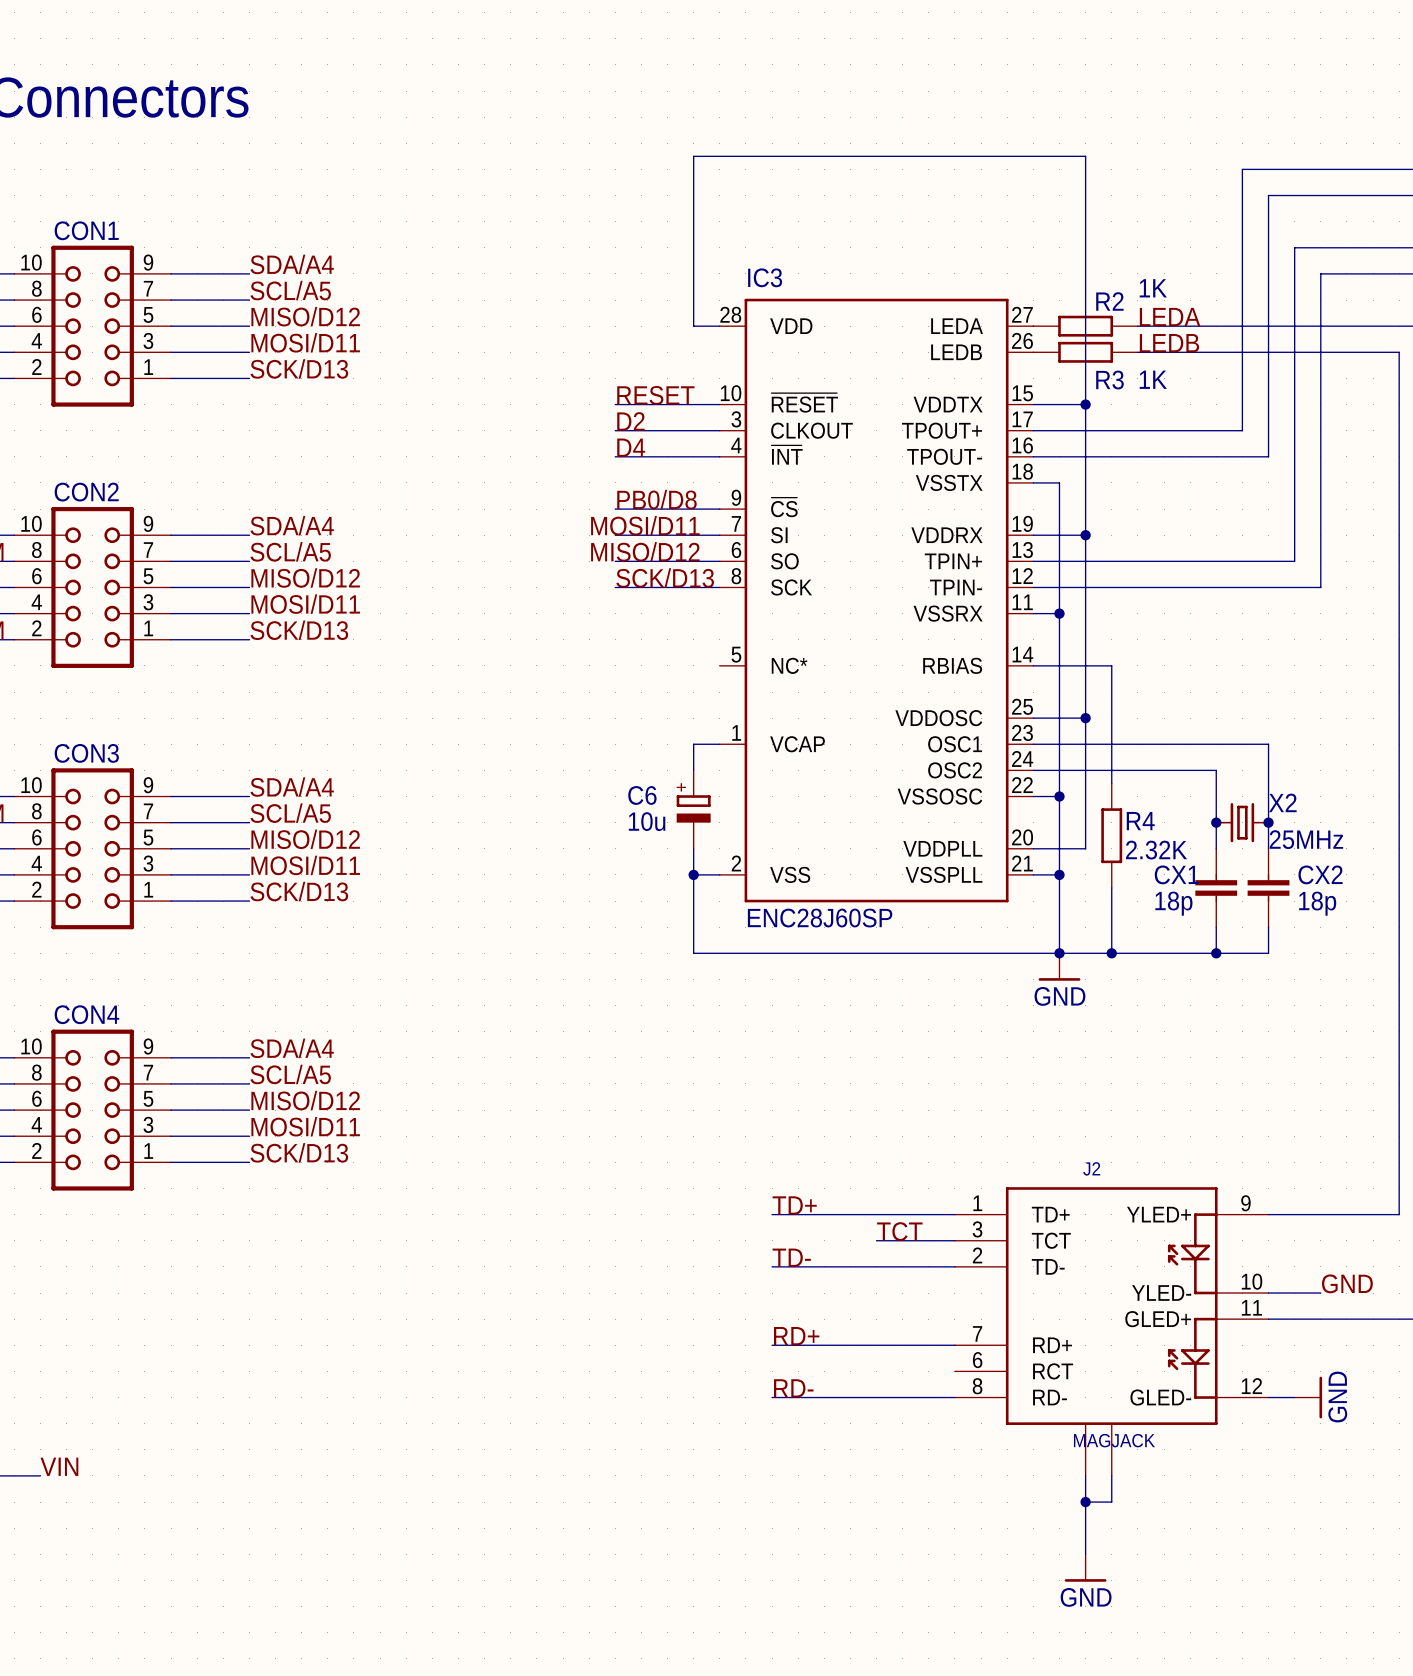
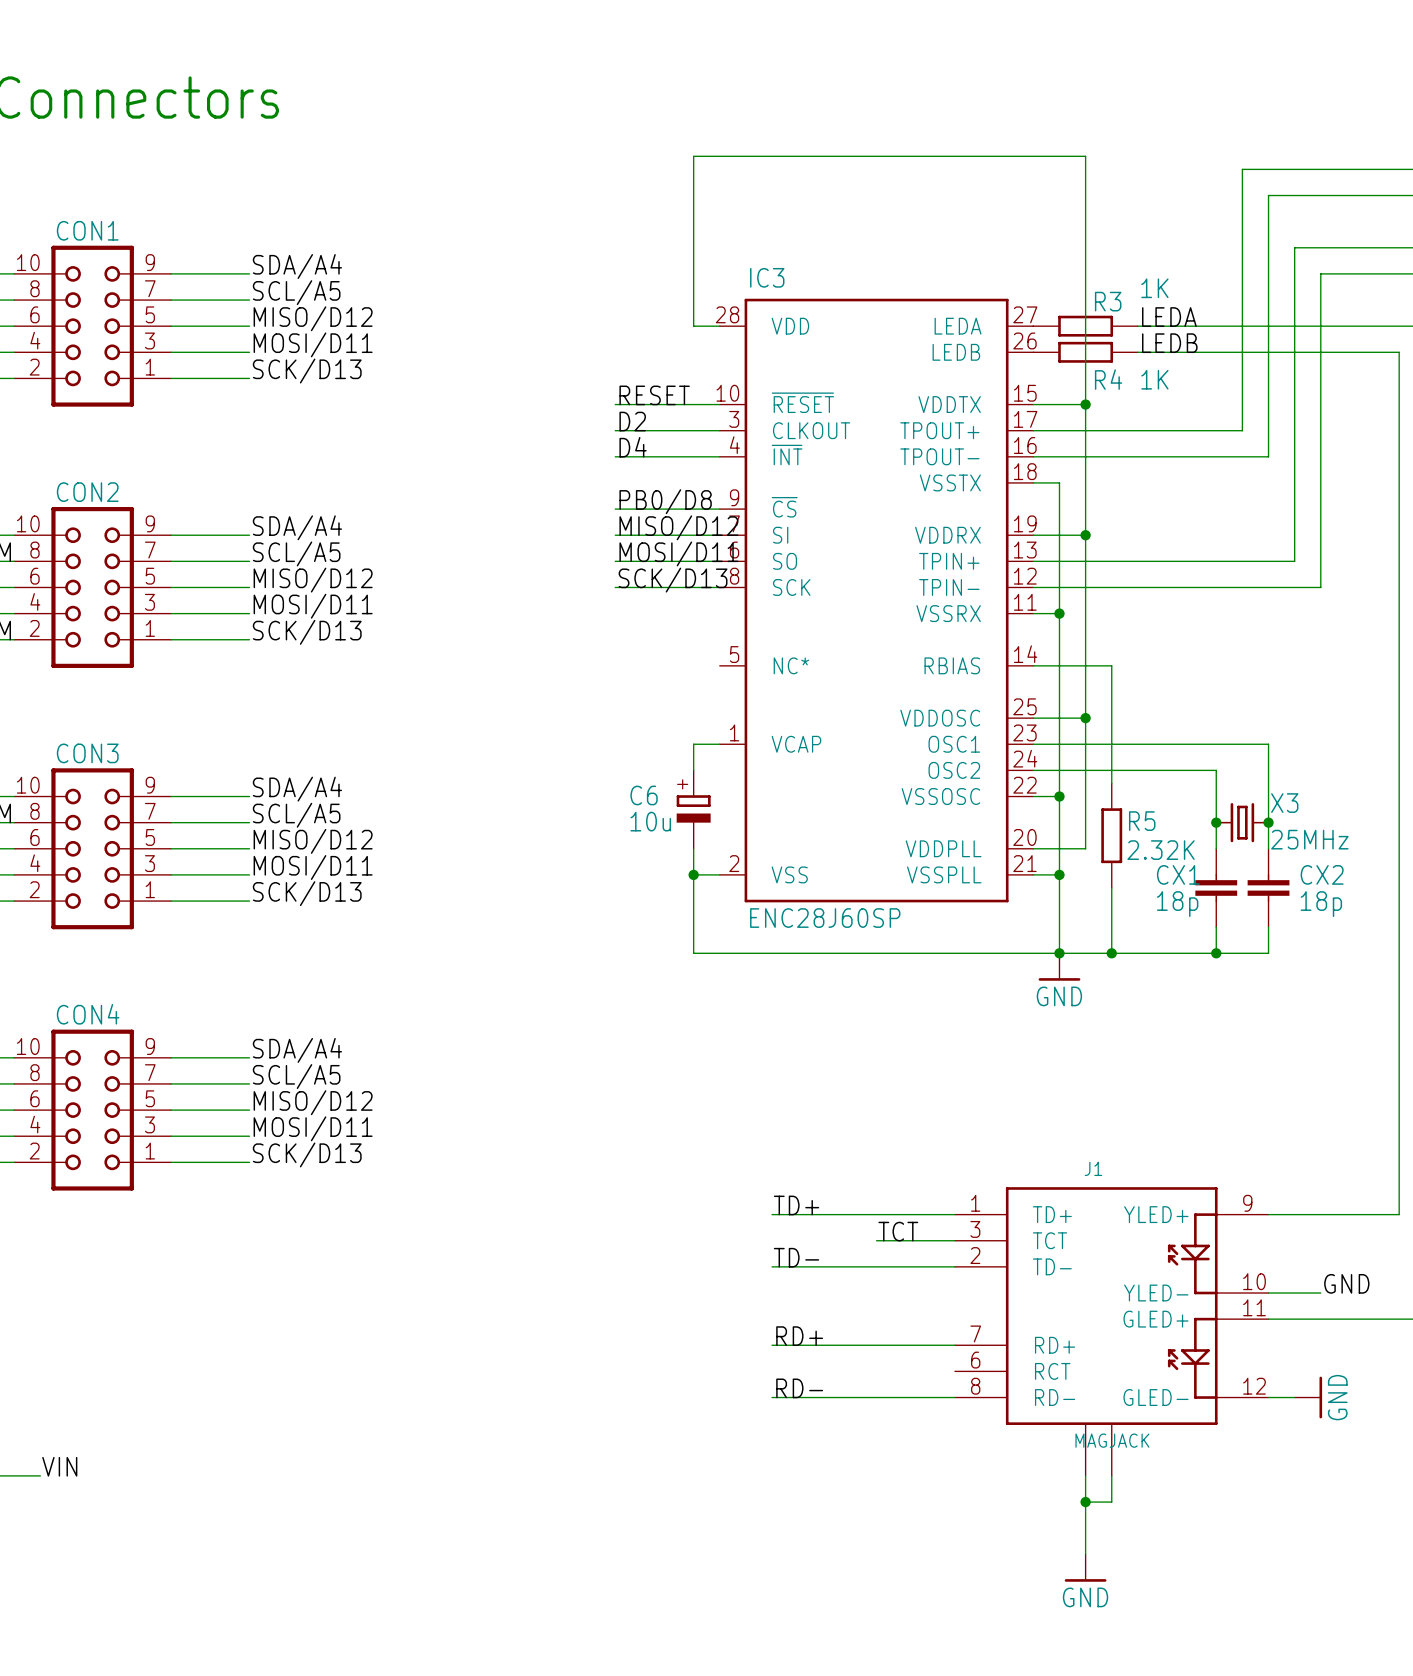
R2 name: R2 (1109, 301) -> R3 (1108, 301)
R3 name: R3 (1109, 379) -> R4 (1108, 379)
label position: MOSI/D11 (645, 525) -> MOSI/D11 (678, 553)
label position: MISO/D12 (645, 551) -> MISO/D12 (678, 527)
X2 name: X2 (1282, 802) -> X3 (1284, 803)
R4 name: R4 (1140, 821) -> R5 (1142, 821)
J2 name: J2 (1091, 1168) -> J1 (1093, 1168)

